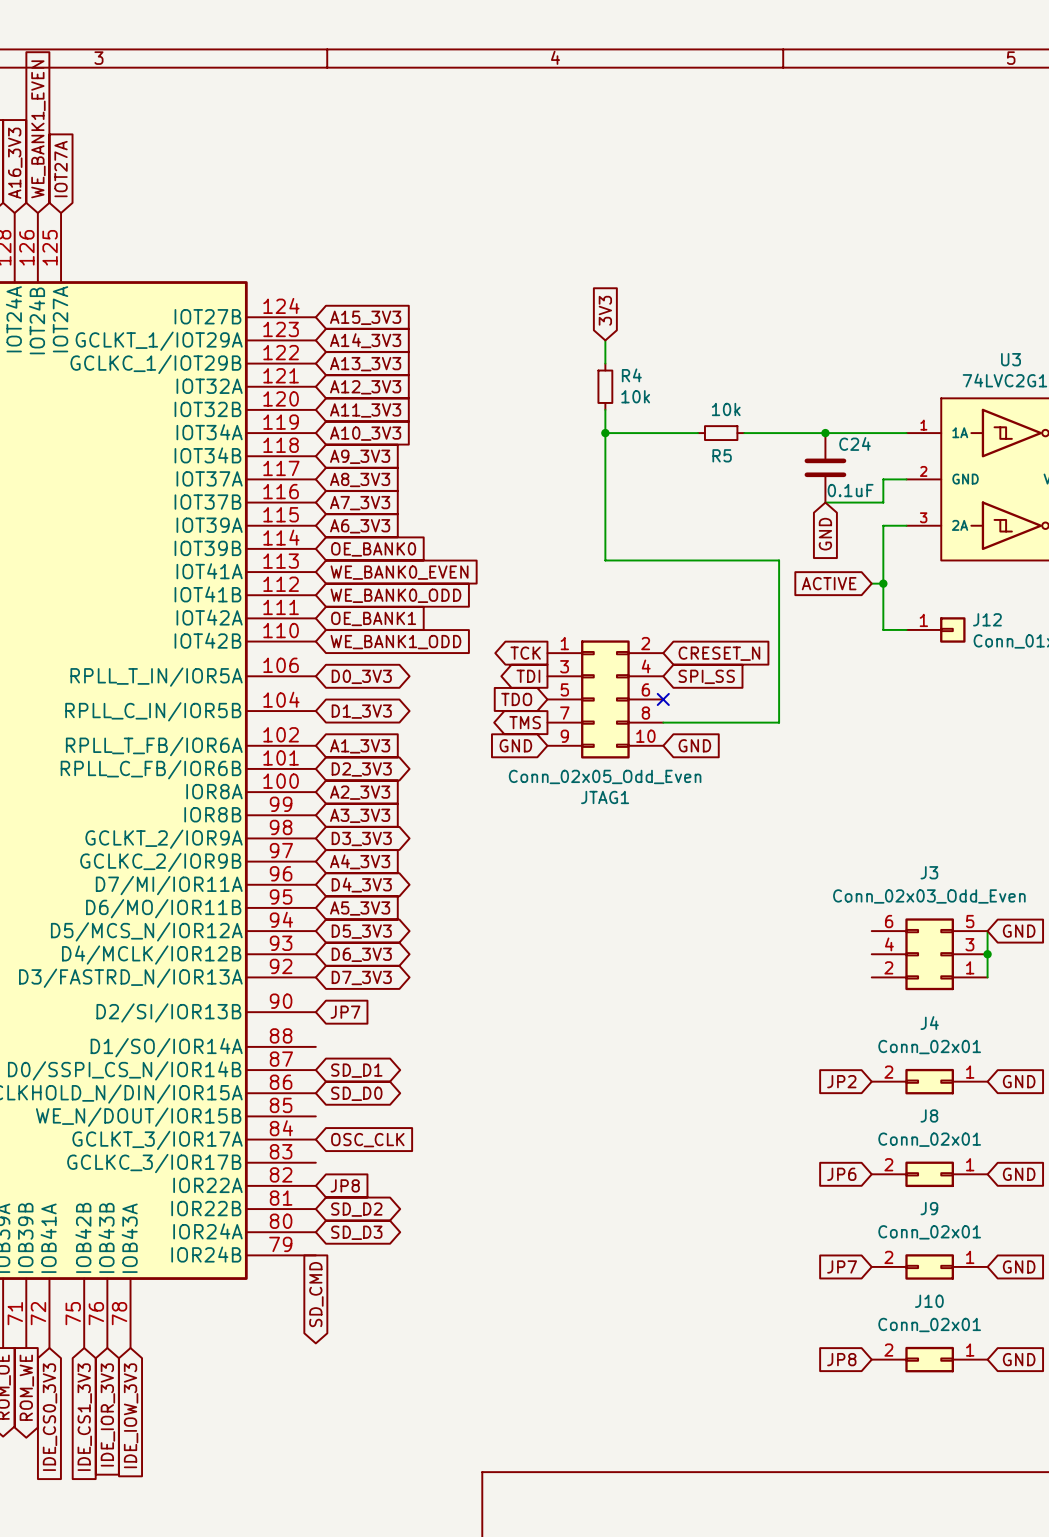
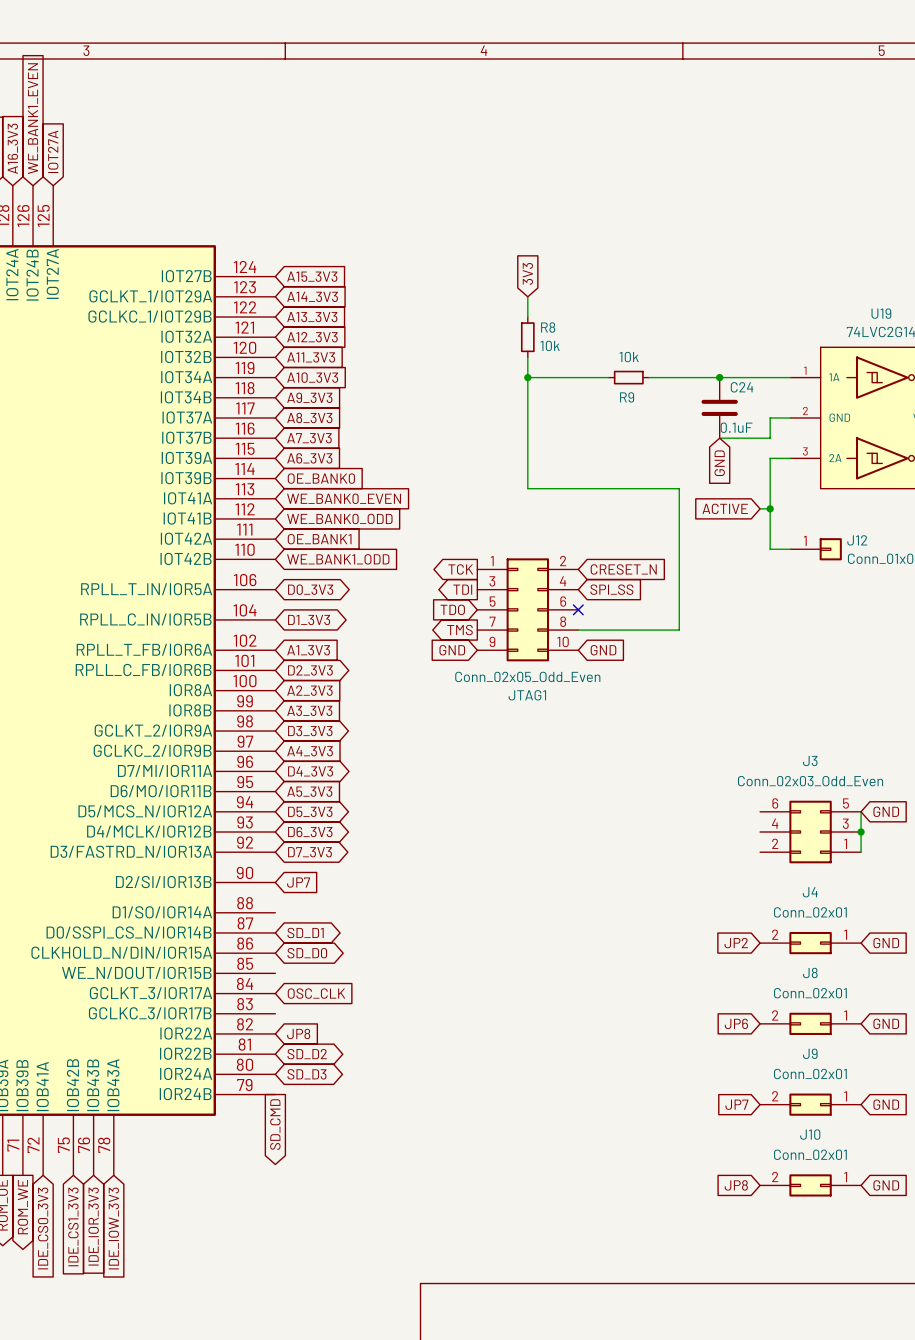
U3 name: U3 (1011, 359) -> U19 (881, 313)
R4 name: R4 (631, 375) -> R8 (548, 327)
R5 name: R5 (722, 455) -> R9 (627, 397)

